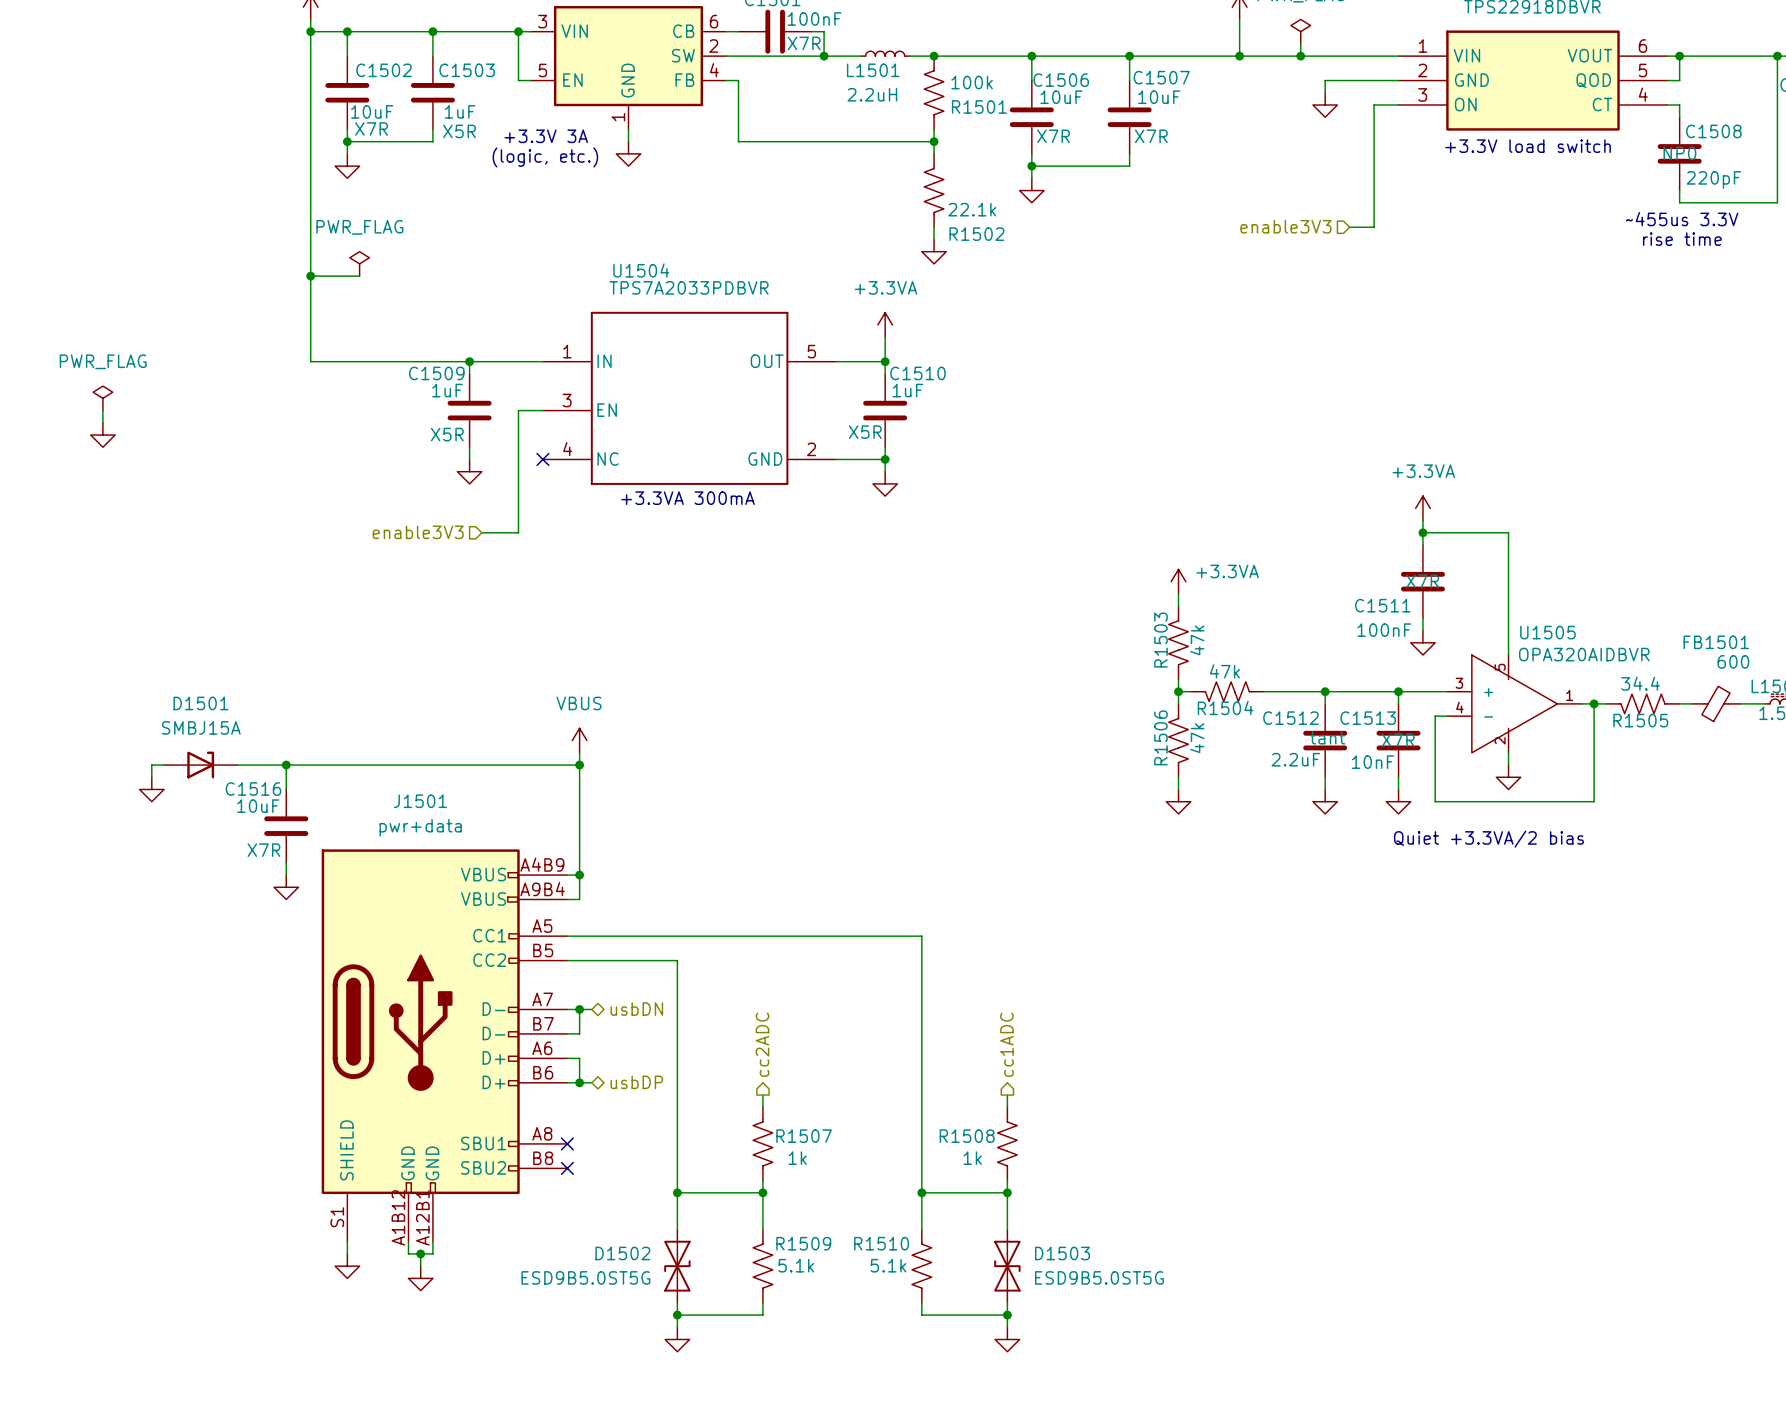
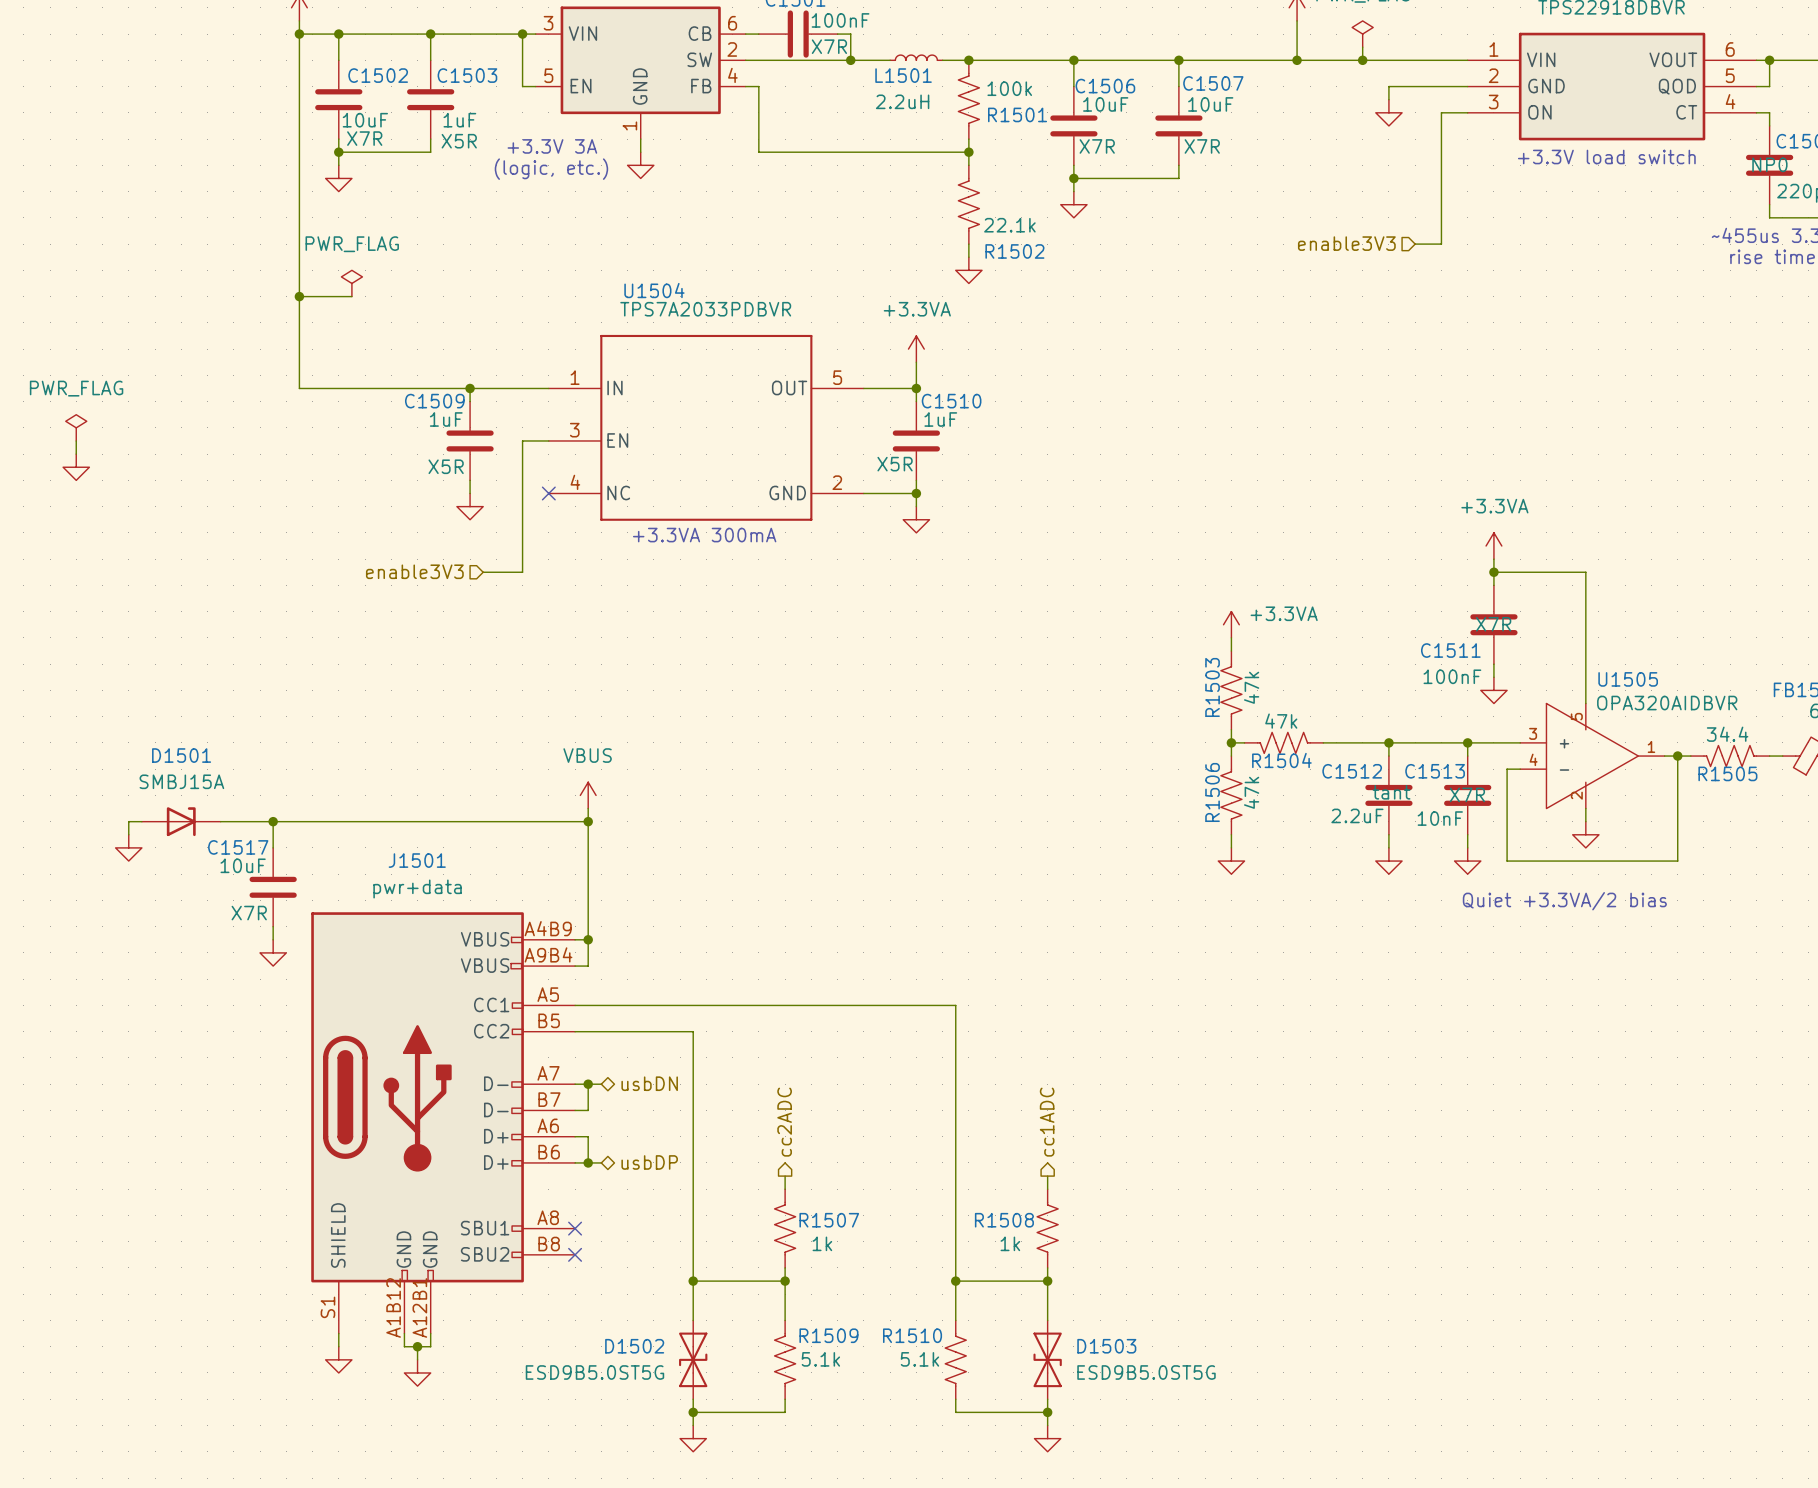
C1516 name: C1516 (253, 789) -> C1517 (238, 847)

